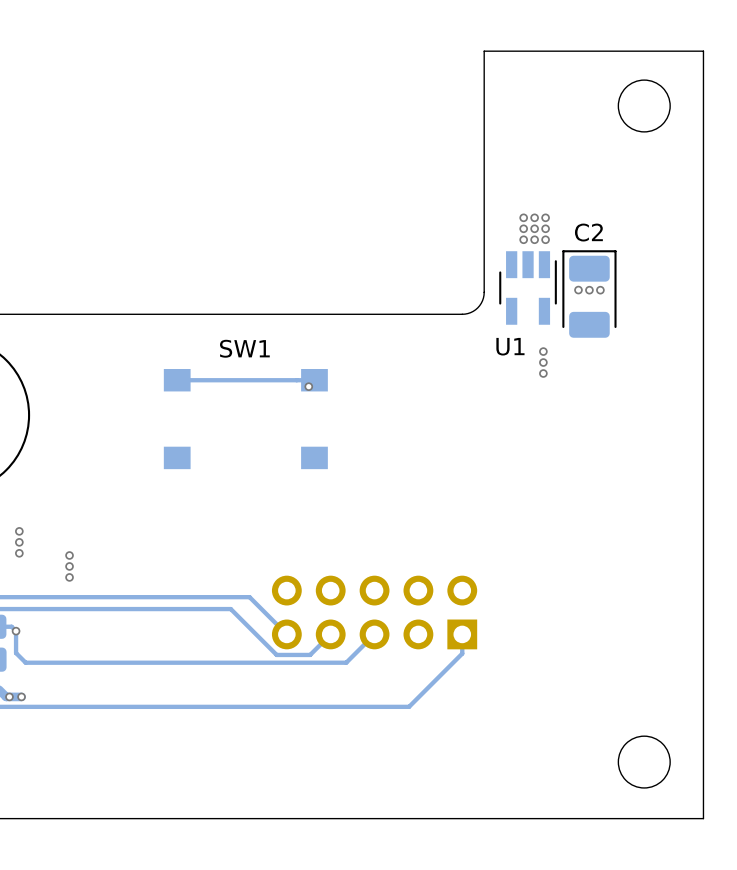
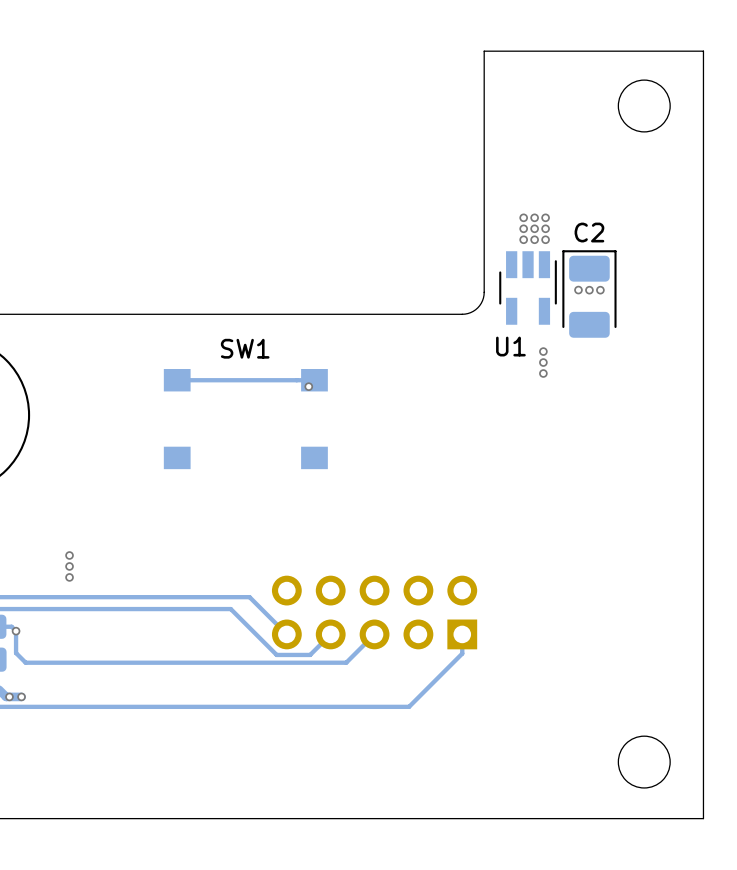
via: (19, 531) -> none
via: (19, 542) -> none
via: (19, 553) -> none

